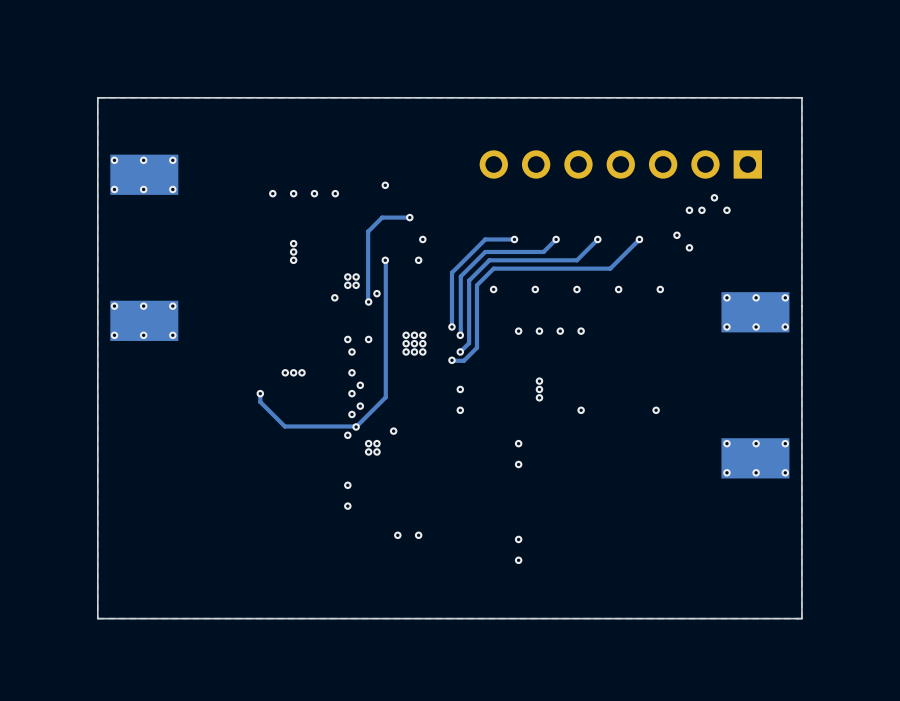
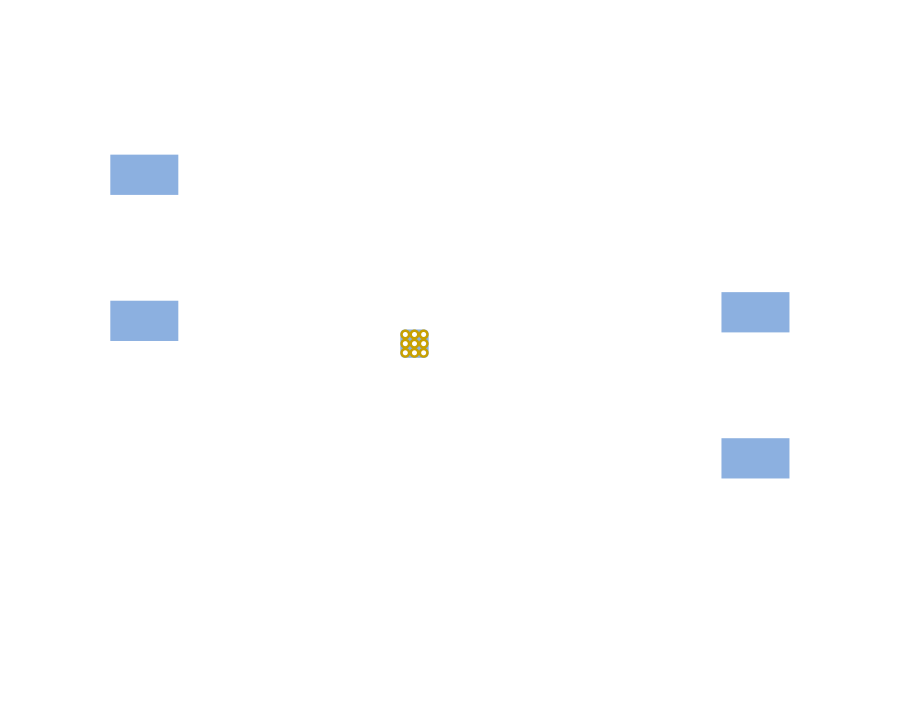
board edge: (801, 97) (97, 97) (97, 618) (801, 618) (801, 97) -> none
via: (114, 160) -> none
via: (143, 160) -> none
via: (172, 160) -> none
part: (620, 164) -> none
via: (385, 185) -> none
via: (114, 189) -> none
via: (143, 189) -> none
via: (172, 189) -> none
via: (272, 193) -> none
via: (293, 193) -> none
via: (314, 193) -> none
via: (335, 193) -> none
via: (714, 197) -> none
via: (689, 210) -> none
via: (701, 210) -> none
via: (726, 210) -> none
track: (409, 217) (382, 217) (368, 231) (368, 301) -> none
via: (409, 217) -> none
via: (676, 235) -> none
via: (422, 239) -> none
track: (514, 239) (485, 239) (451, 272) (451, 326) -> none
via: (514, 239) -> none
track: (556, 239) (543, 251) (485, 251) (460, 276) (460, 335) -> none
via: (556, 239) -> none
track: (597, 239) (576, 260) (489, 260) (469, 280) (469, 343) (460, 351) -> none
via: (597, 239) -> none
track: (639, 239) (610, 268) (493, 268) (476, 285) (476, 347) (463, 360) (451, 360) -> none
via: (639, 239) -> none
via: (293, 243) -> none
via: (689, 247) -> none
via: (293, 251) -> none
via: (293, 260) -> none
track: (385, 260) (385, 397) (356, 426) (284, 426) (260, 401) (260, 393) -> none
via: (385, 260) -> none
via: (418, 260) -> none
via: (347, 276) -> none
via: (356, 276) -> none
via: (347, 285) -> none
via: (356, 285) -> none
via: (493, 289) -> none
via: (535, 289) -> none
via: (576, 289) -> none
via: (618, 289) -> none
via: (660, 289) -> none
via: (376, 293) -> none
via: (334, 297) -> none
via: (726, 297) -> none
via: (756, 297) -> none
via: (785, 297) -> none
via: (368, 301) -> none
via: (114, 306) -> none
via: (143, 306) -> none
via: (172, 306) -> none
via: (451, 326) -> none
via: (726, 326) -> none
via: (756, 326) -> none
via: (785, 326) -> none
via: (518, 331) -> none
via: (539, 331) -> none
via: (560, 331) -> none
via: (581, 331) -> none
via: (114, 335) -> none
via: (143, 335) -> none
via: (172, 335) -> none
via: (406, 335) -> none
via: (414, 335) -> none
via: (422, 335) -> none
via: (460, 335) -> none
via: (347, 339) -> none
via: (368, 339) -> none
via: (406, 343) -> none
part: none -> (414, 343)
via: (414, 343) -> none
via: (422, 343) -> none
via: (351, 351) -> none
via: (406, 351) -> none
via: (414, 351) -> none
via: (422, 351) -> none
via: (460, 351) -> none
via: (451, 360) -> none
via: (285, 372) -> none
via: (293, 372) -> none
via: (301, 372) -> none
via: (351, 372) -> none
via: (539, 381) -> none
via: (360, 385) -> none
via: (460, 389) -> none
via: (539, 389) -> none
via: (260, 393) -> none
via: (351, 393) -> none
via: (539, 397) -> none
via: (360, 406) -> none
via: (460, 410) -> none
via: (581, 410) -> none
via: (656, 410) -> none
via: (351, 414) -> none
via: (356, 426) -> none
via: (393, 431) -> none
via: (347, 435) -> none
via: (368, 443) -> none
via: (376, 443) -> none
via: (518, 443) -> none
via: (726, 443) -> none
via: (756, 443) -> none
via: (785, 443) -> none
via: (368, 451) -> none
via: (376, 451) -> none
via: (518, 464) -> none
via: (726, 472) -> none
via: (756, 472) -> none
via: (785, 472) -> none
via: (347, 485) -> none
via: (347, 506) -> none
via: (397, 535) -> none
via: (418, 535) -> none
via: (518, 539) -> none
via: (518, 560) -> none

